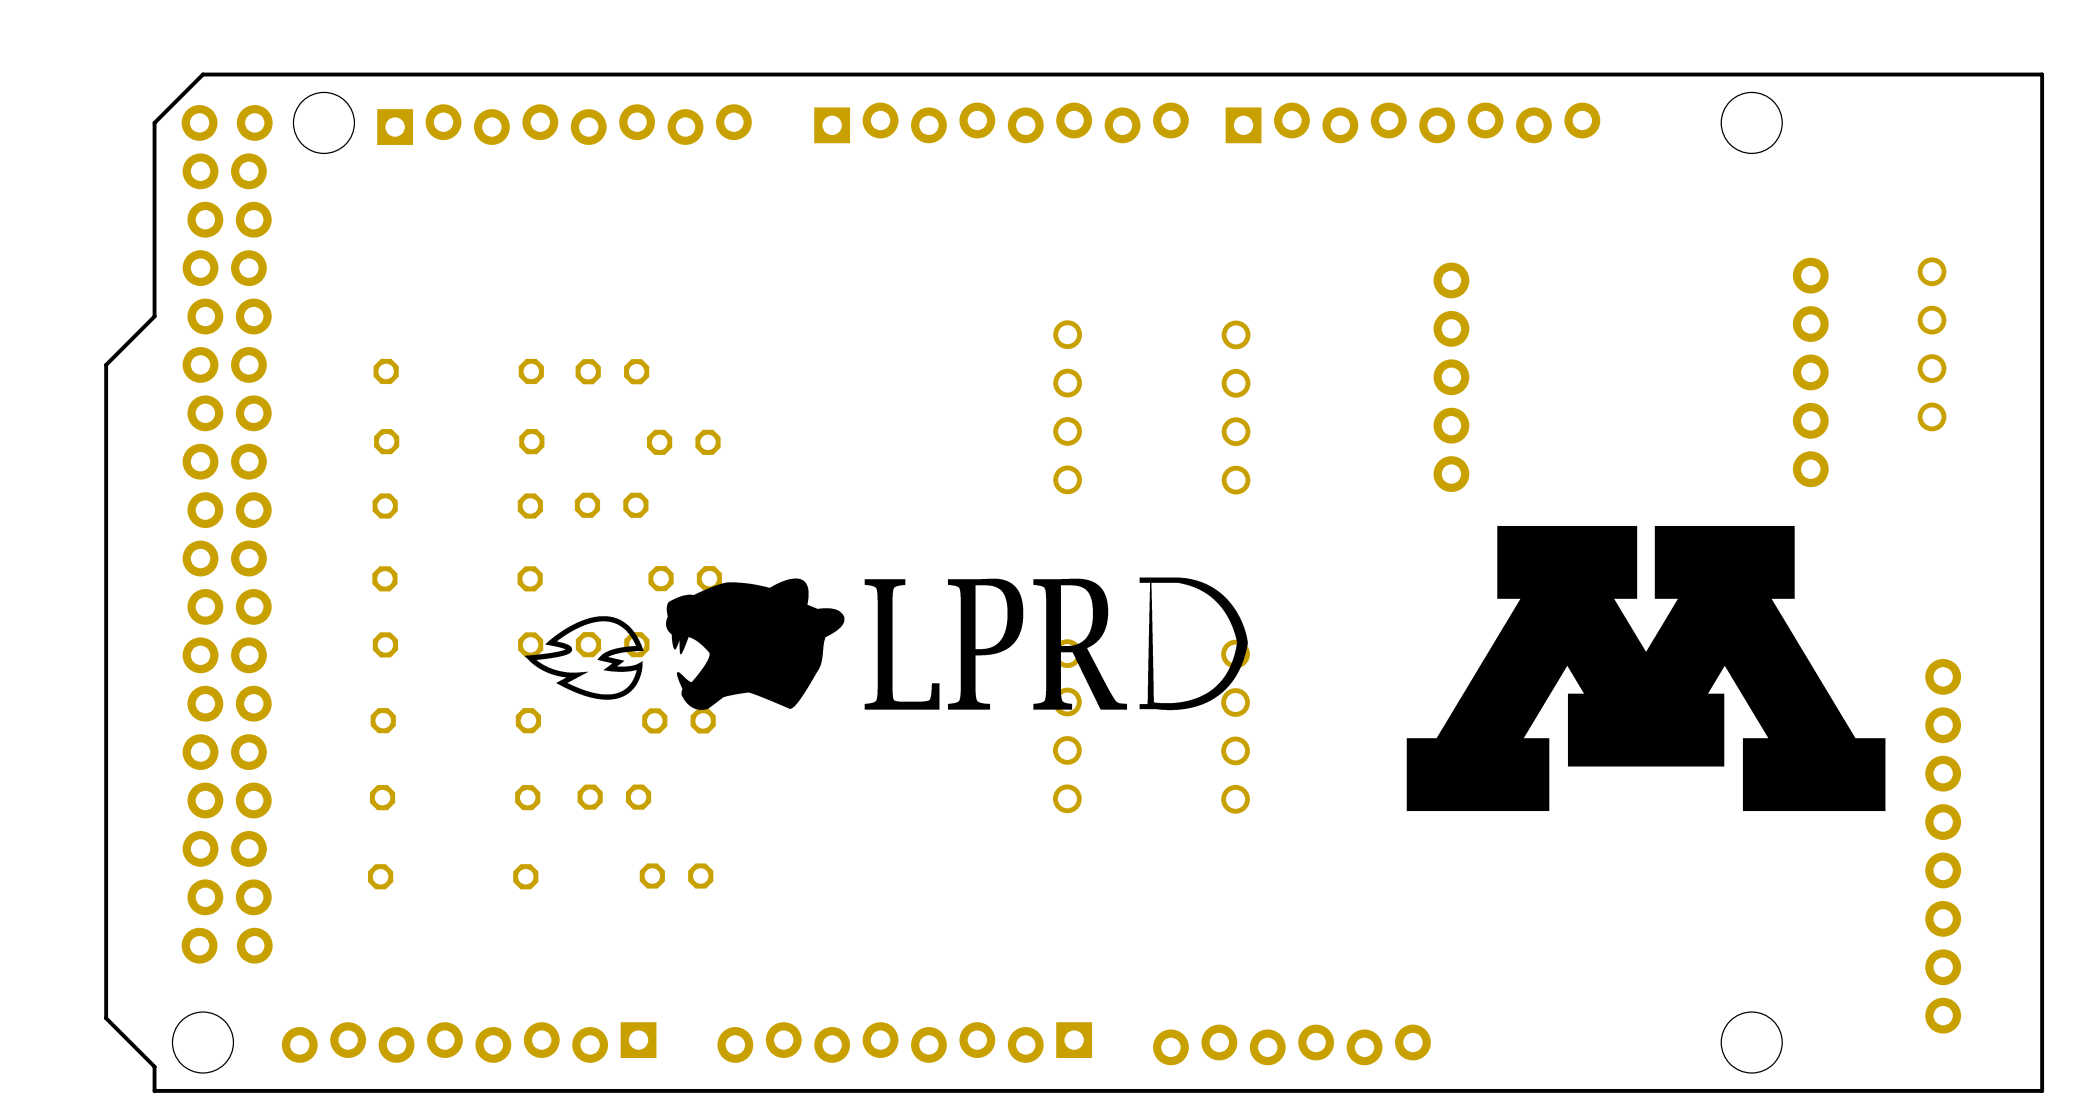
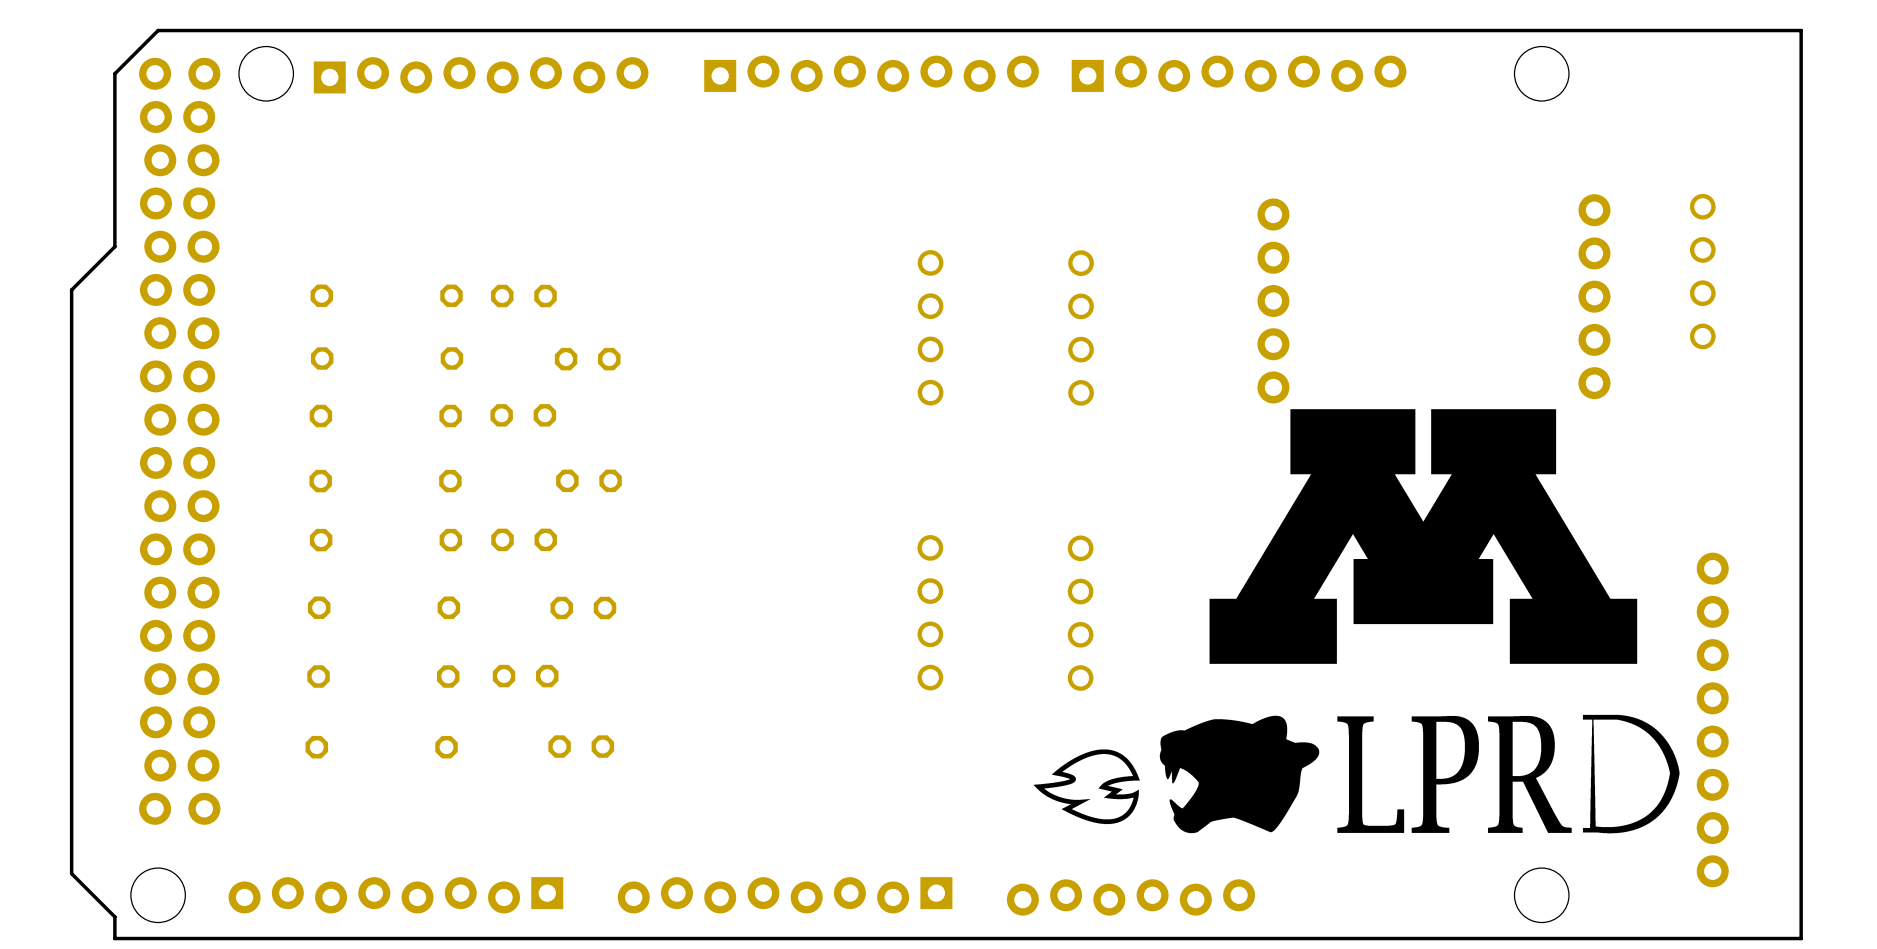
drawing: [524, 577, 1248, 711] -> none
drawing position: (1646, 668) -> (1423, 536)
drawing: none -> [1033, 714, 1680, 834]

